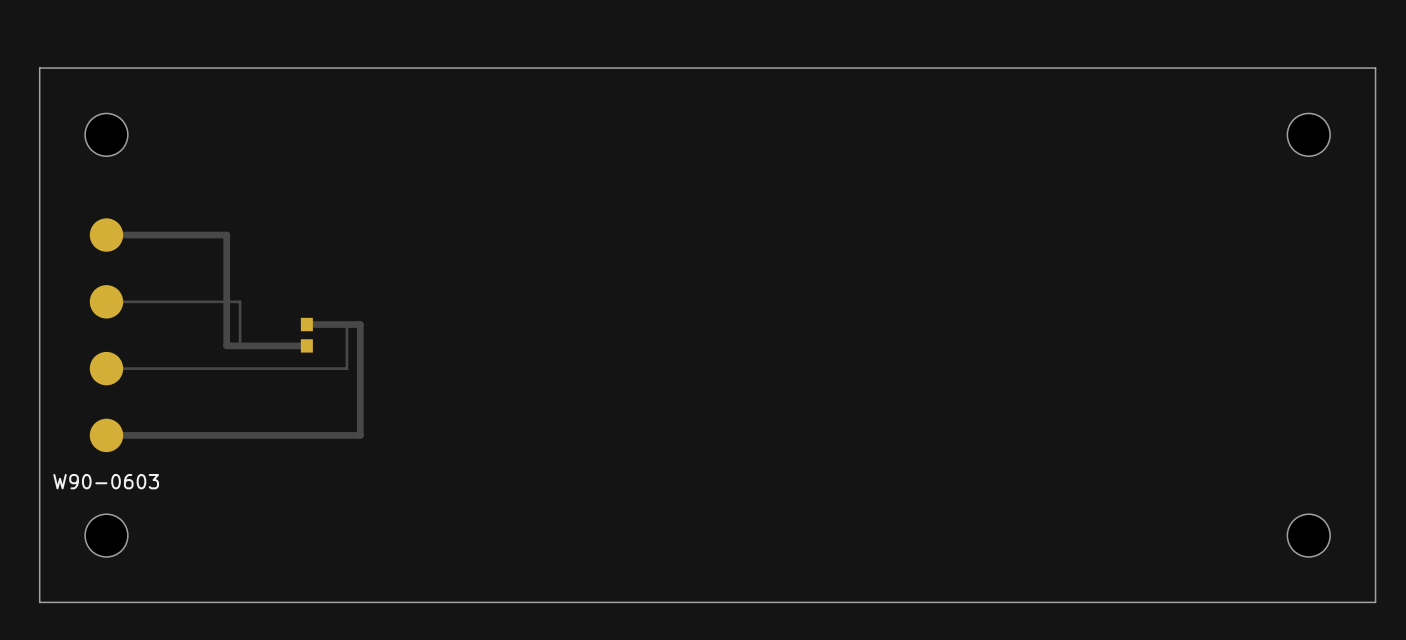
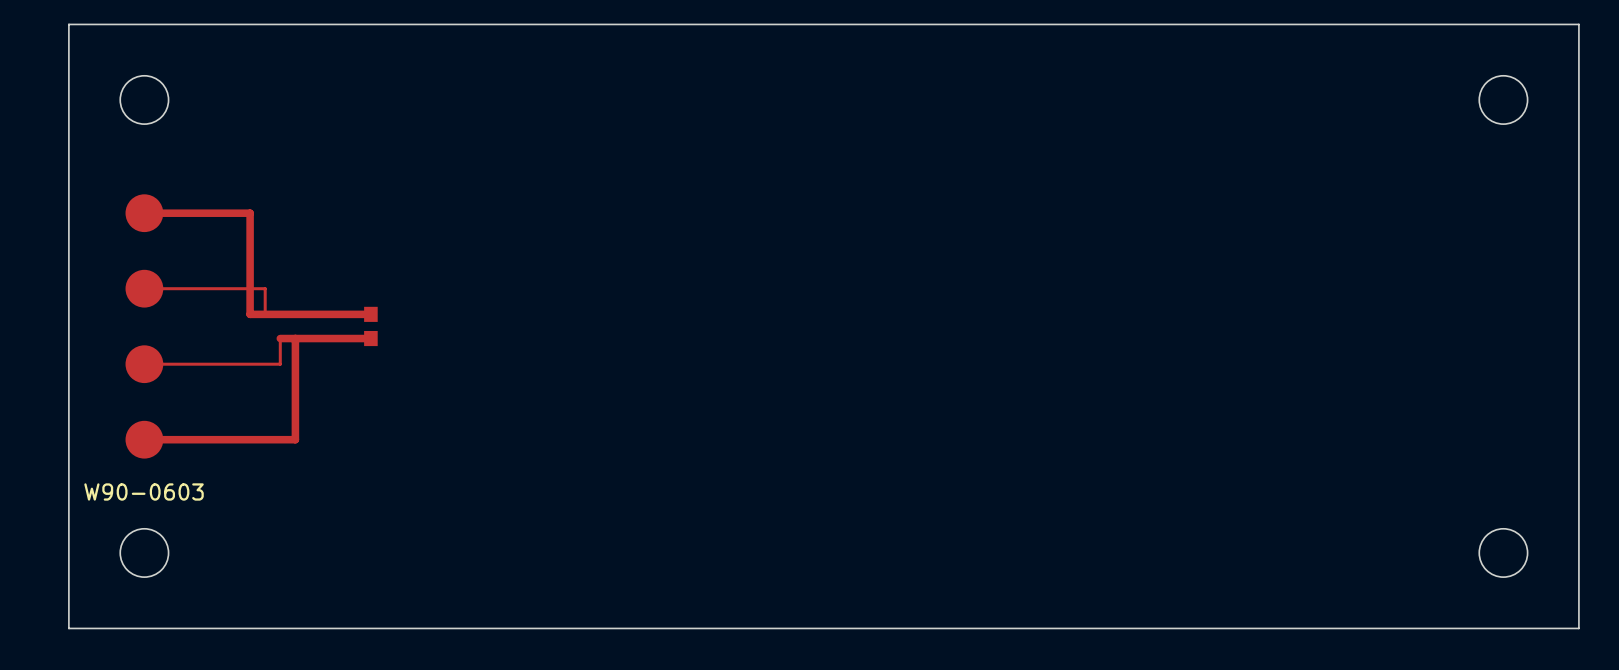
track: (199, 235) (226, 235) (226, 345) -> (250, 213) (250, 314) (370, 314) (265, 314) (265, 288)
track: (213, 301) (240, 301) (240, 345) -> none
track: none -> (280, 338) (280, 364)
track: (226, 368) (346, 368) (346, 324) (306, 324) (360, 324) (360, 435) (240, 435) -> (295, 338) (295, 439)

